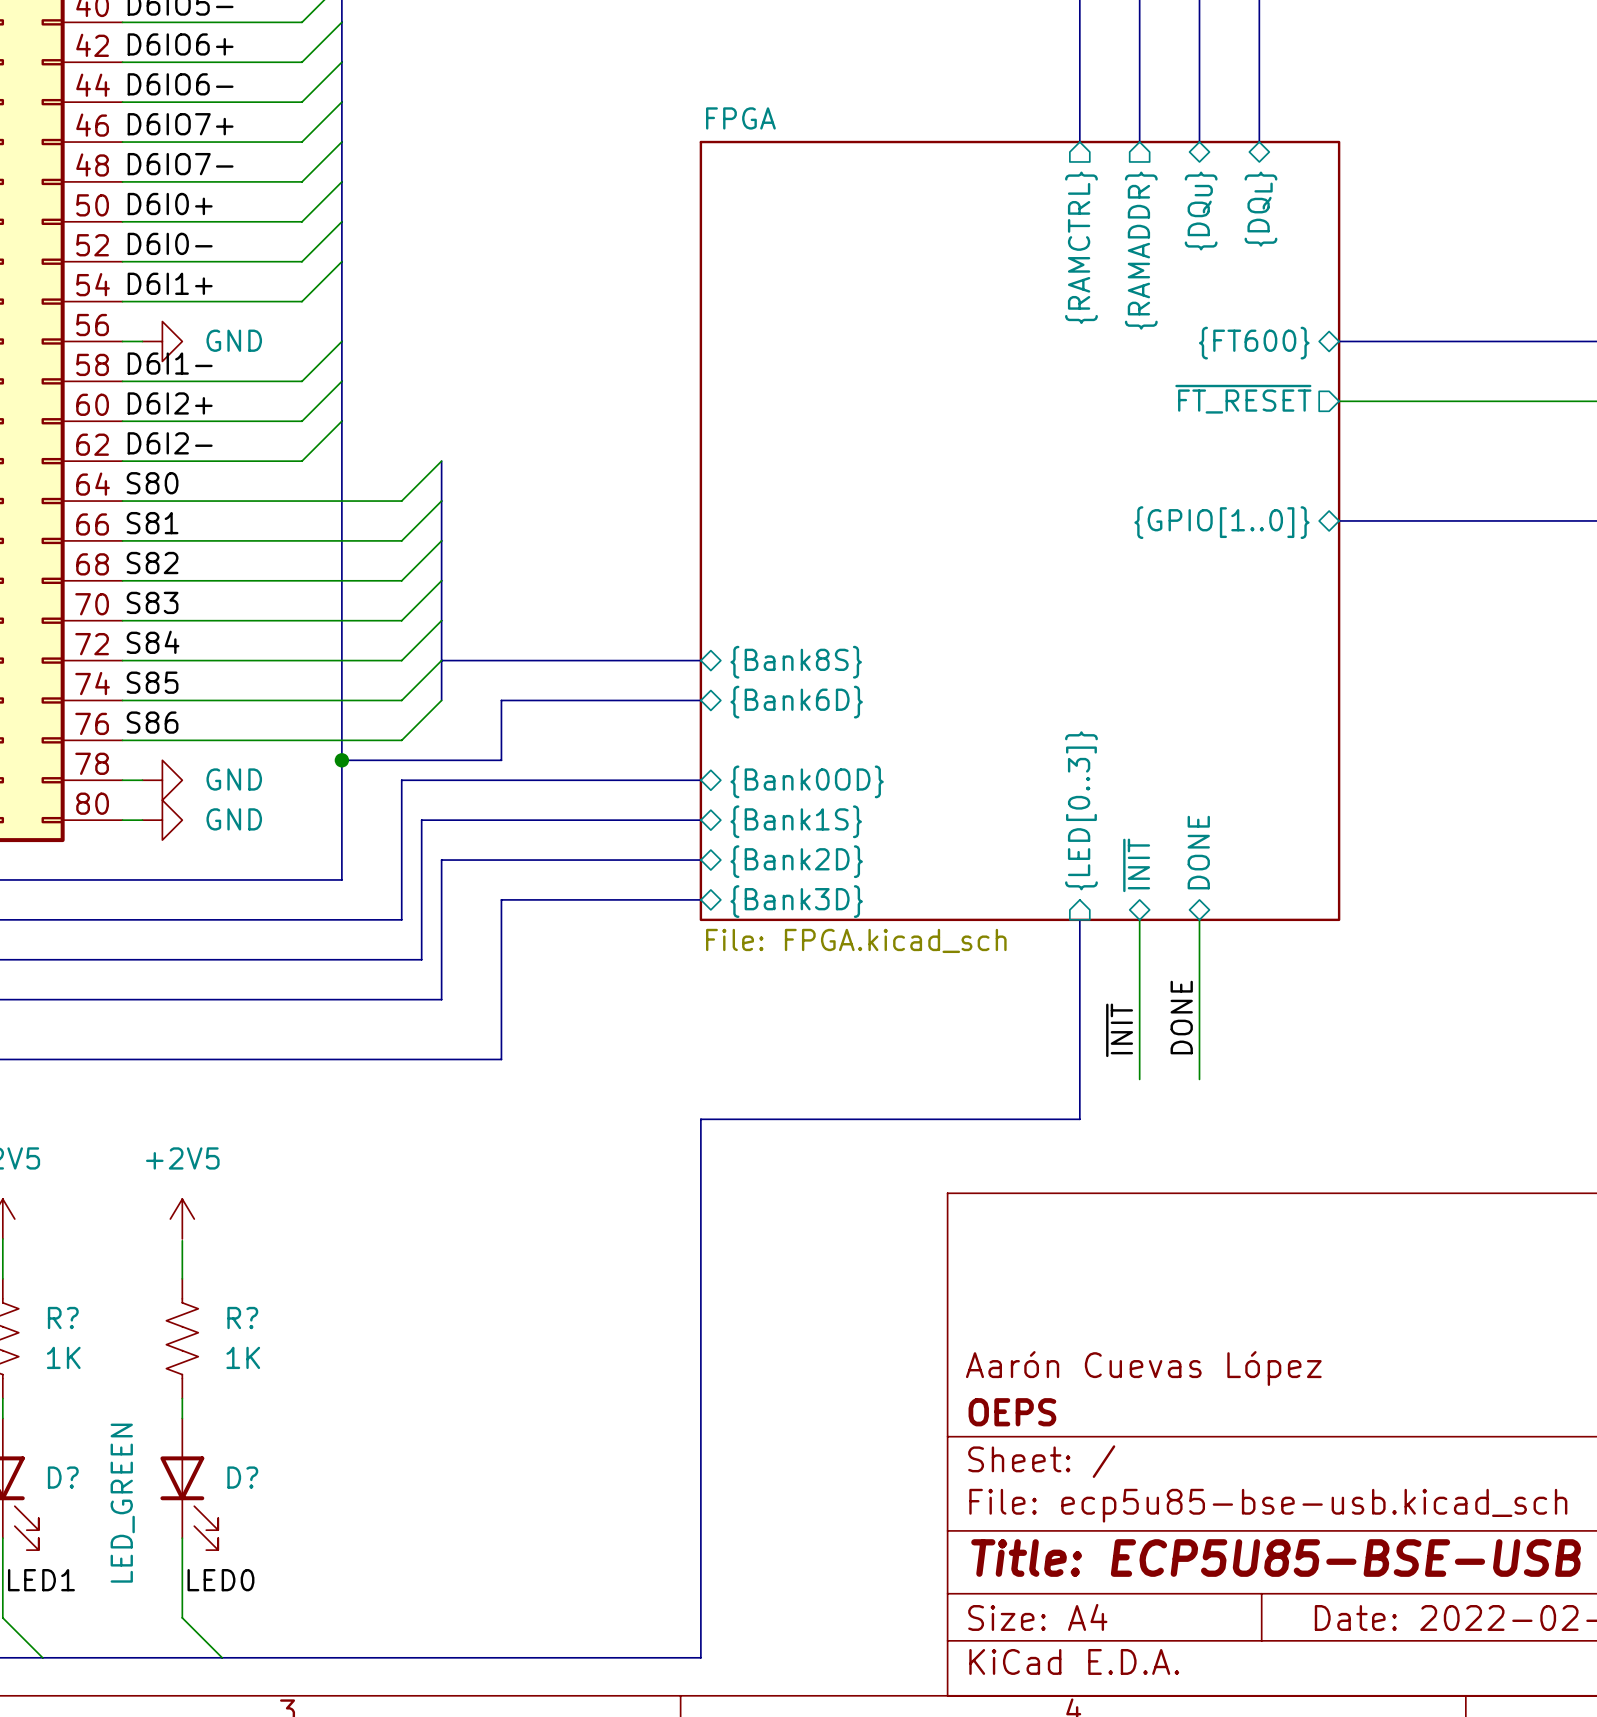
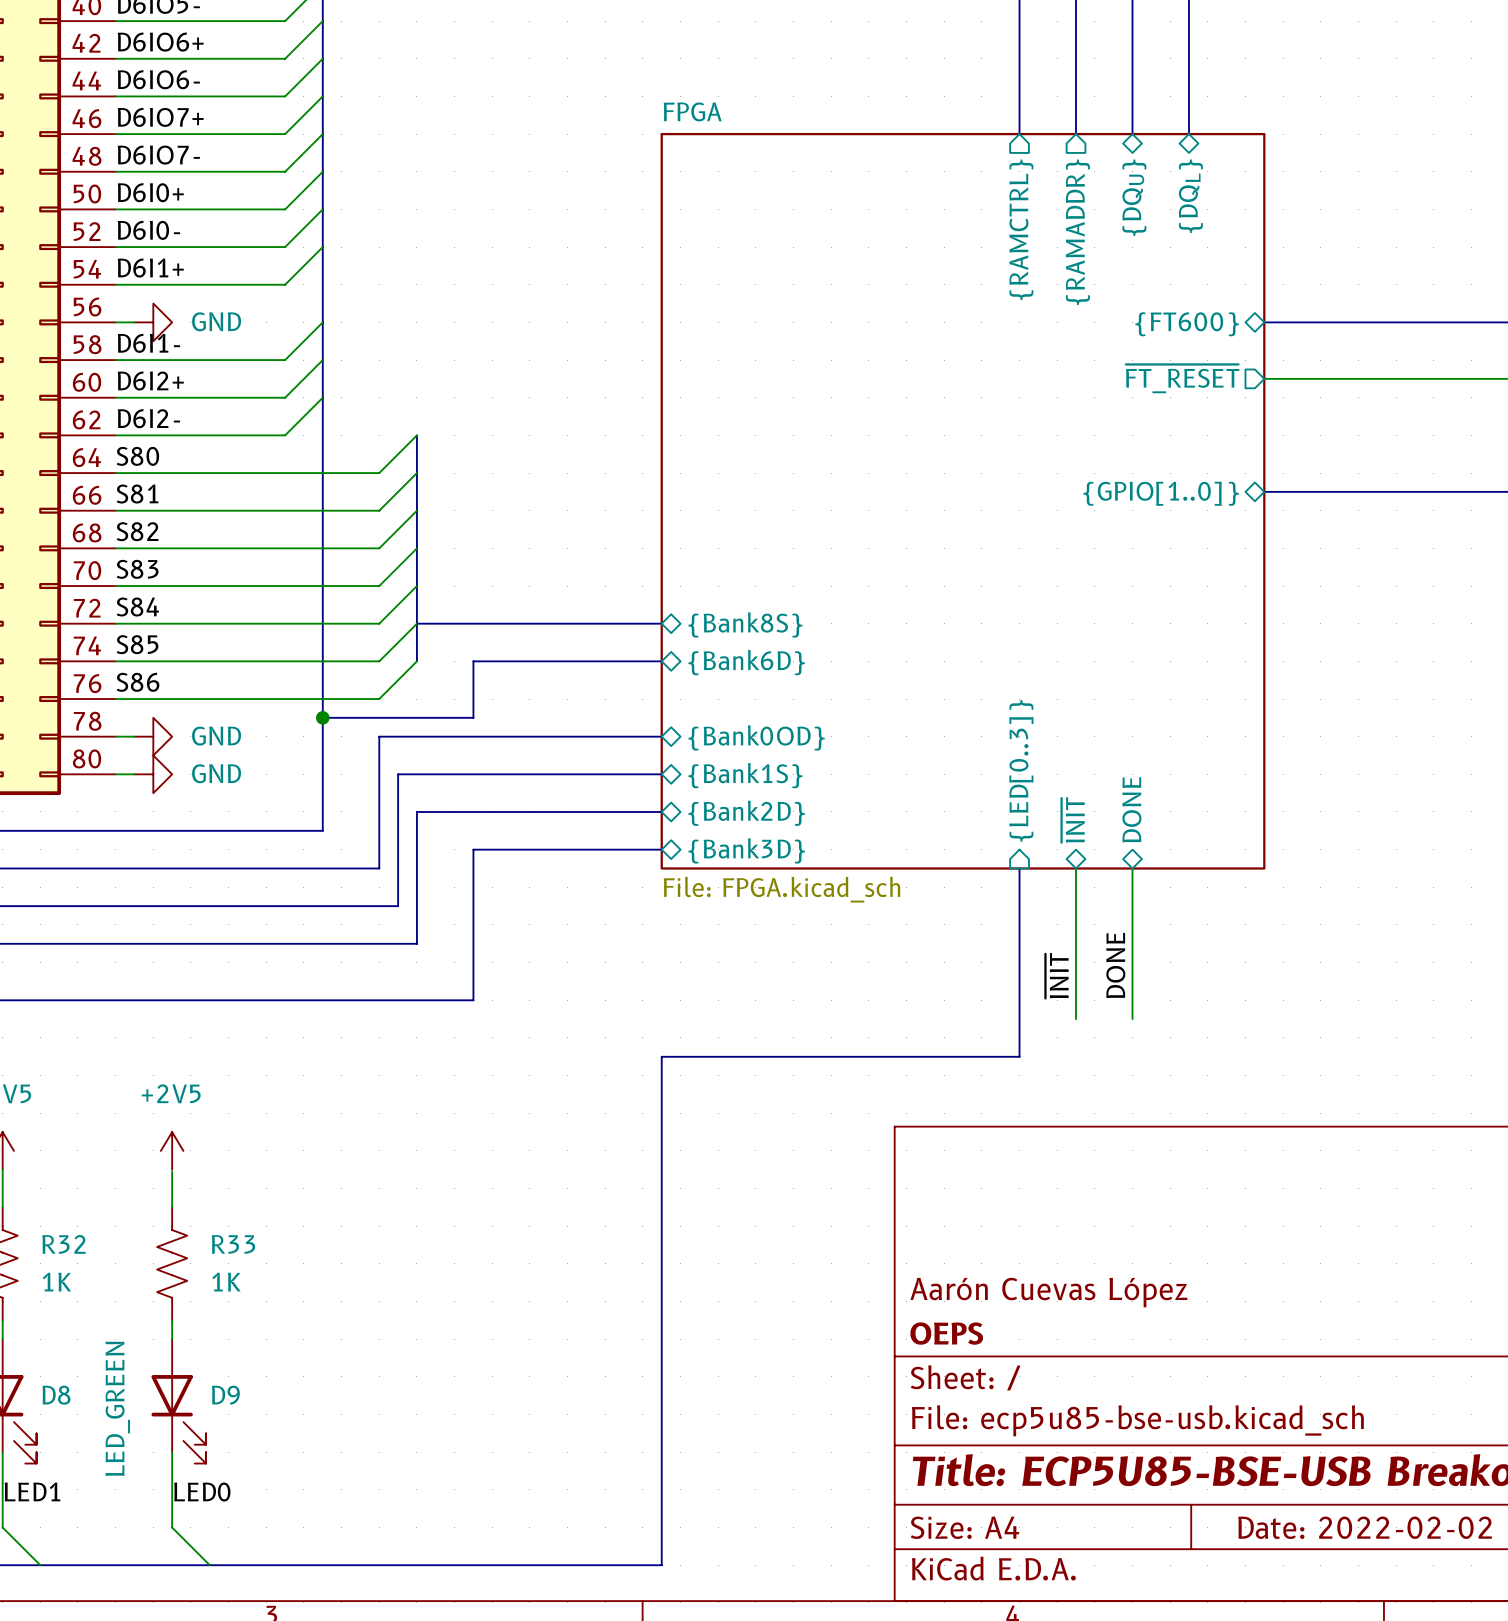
R? name: R? (63, 1318) -> R32 (63, 1244)
R? name: R? (242, 1318) -> R33 (233, 1244)
D? name: D? (63, 1477) -> D8 (56, 1395)
D? name: D? (242, 1477) -> D9 (225, 1395)

